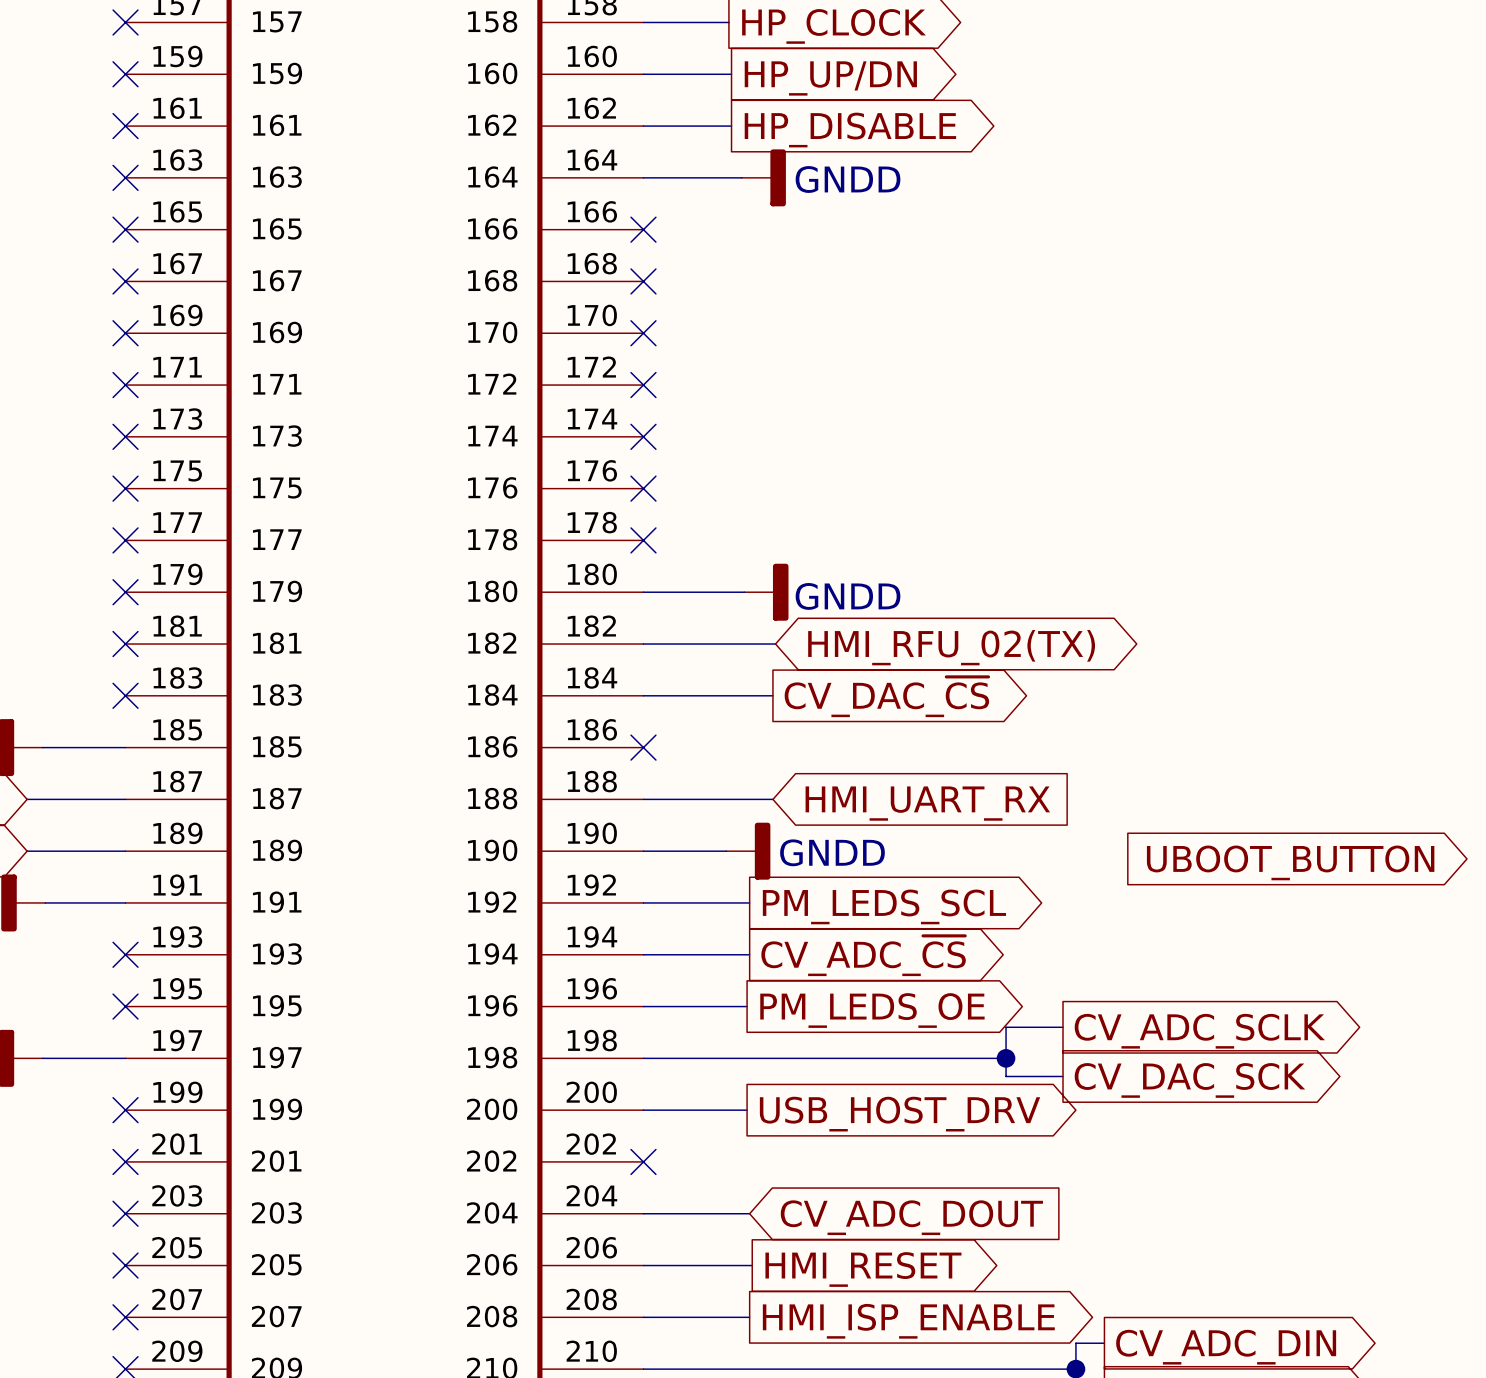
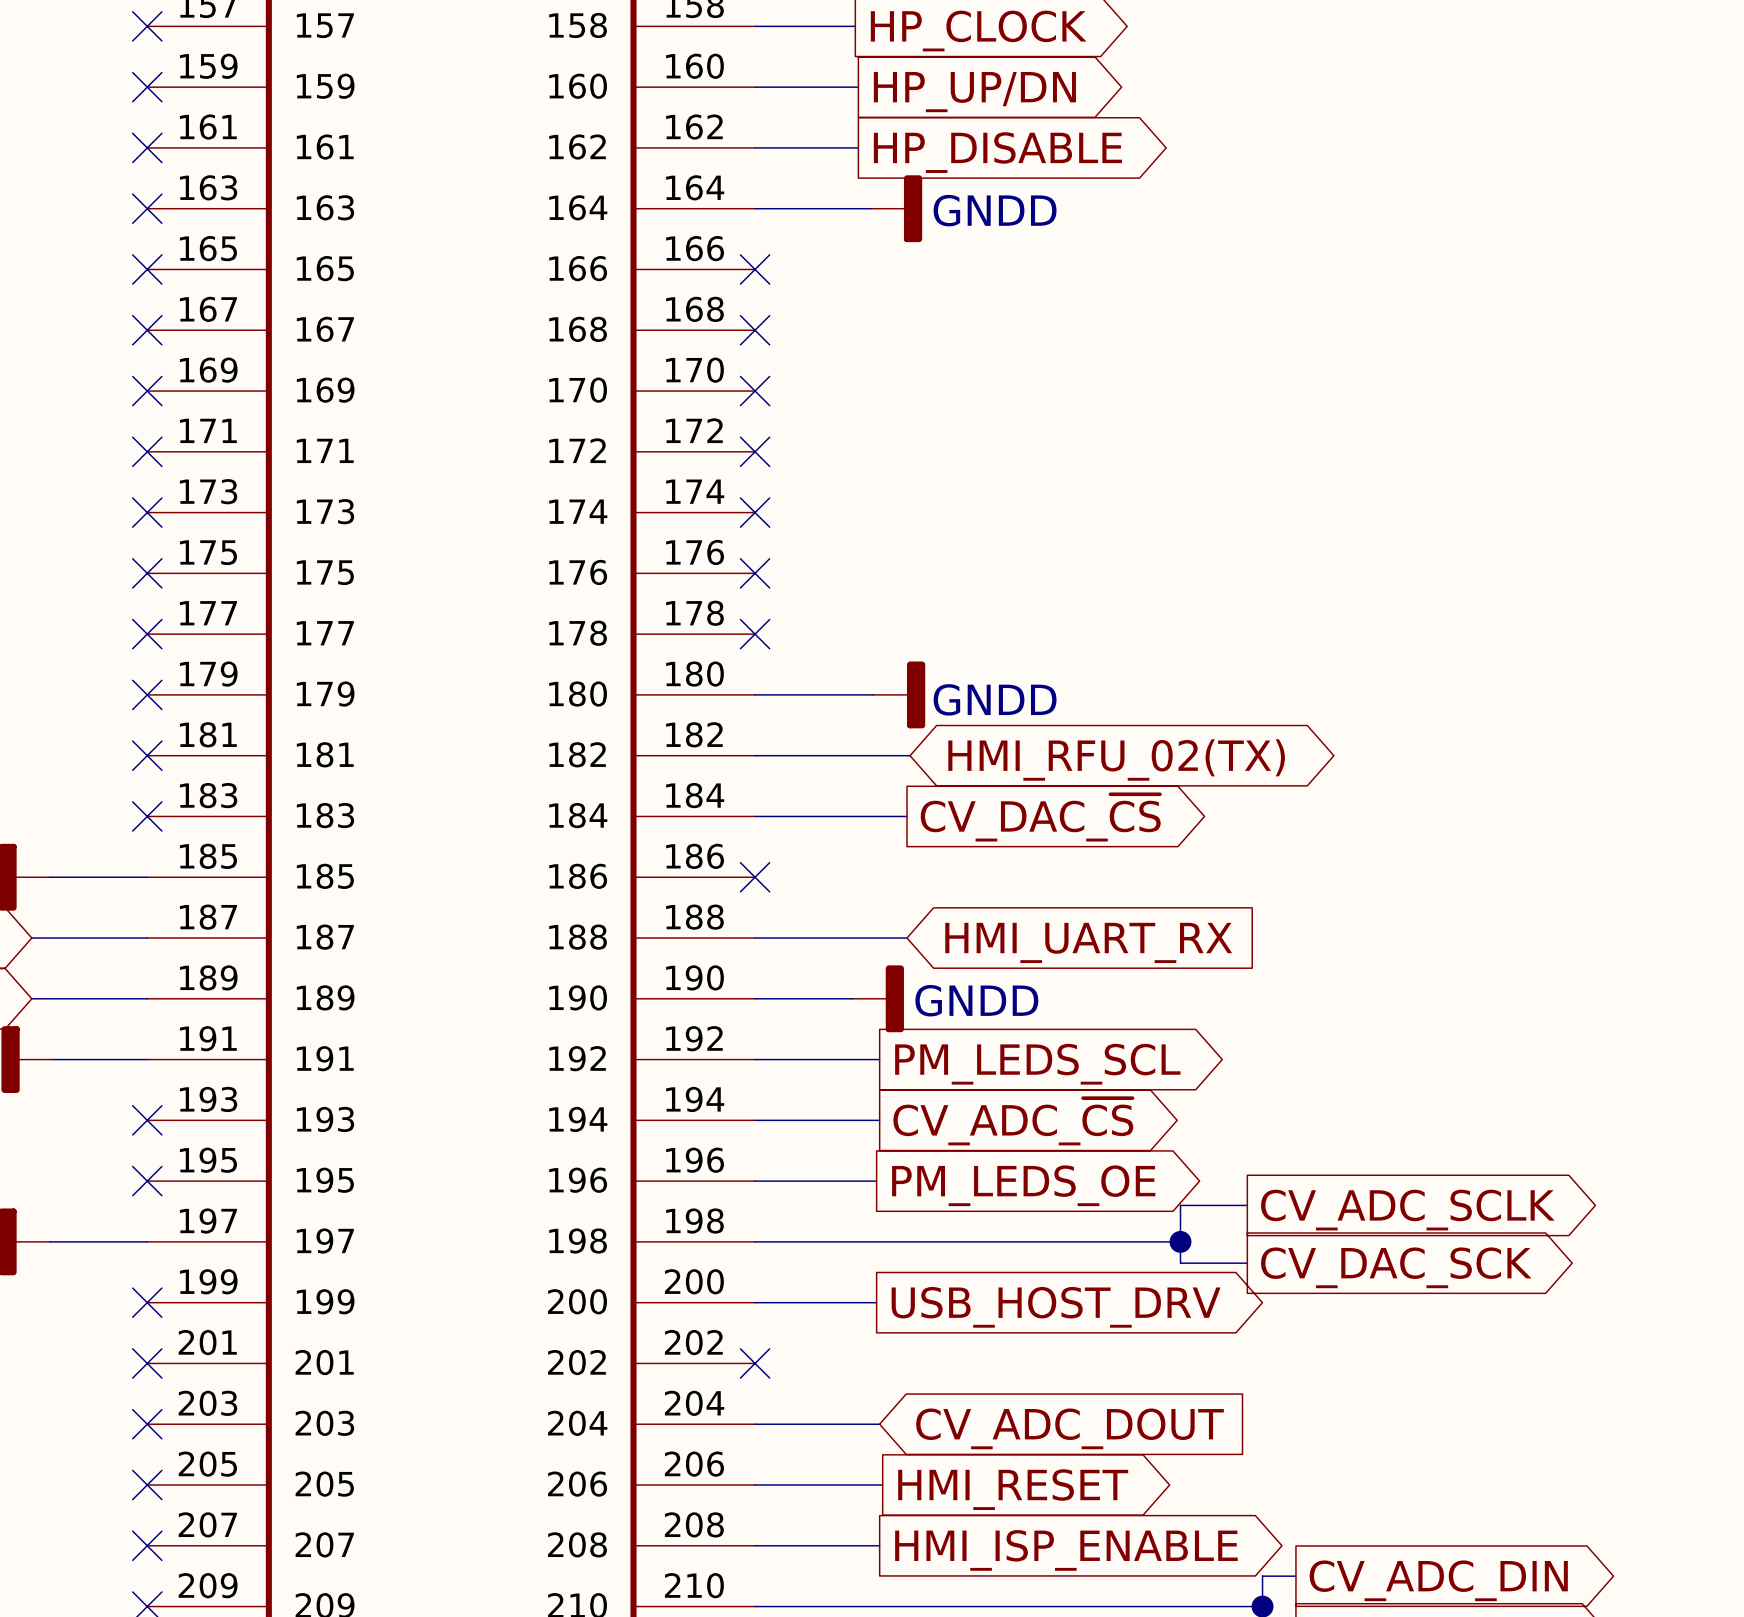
global label: UBOOT_BUTTON (1290, 862) -> none

